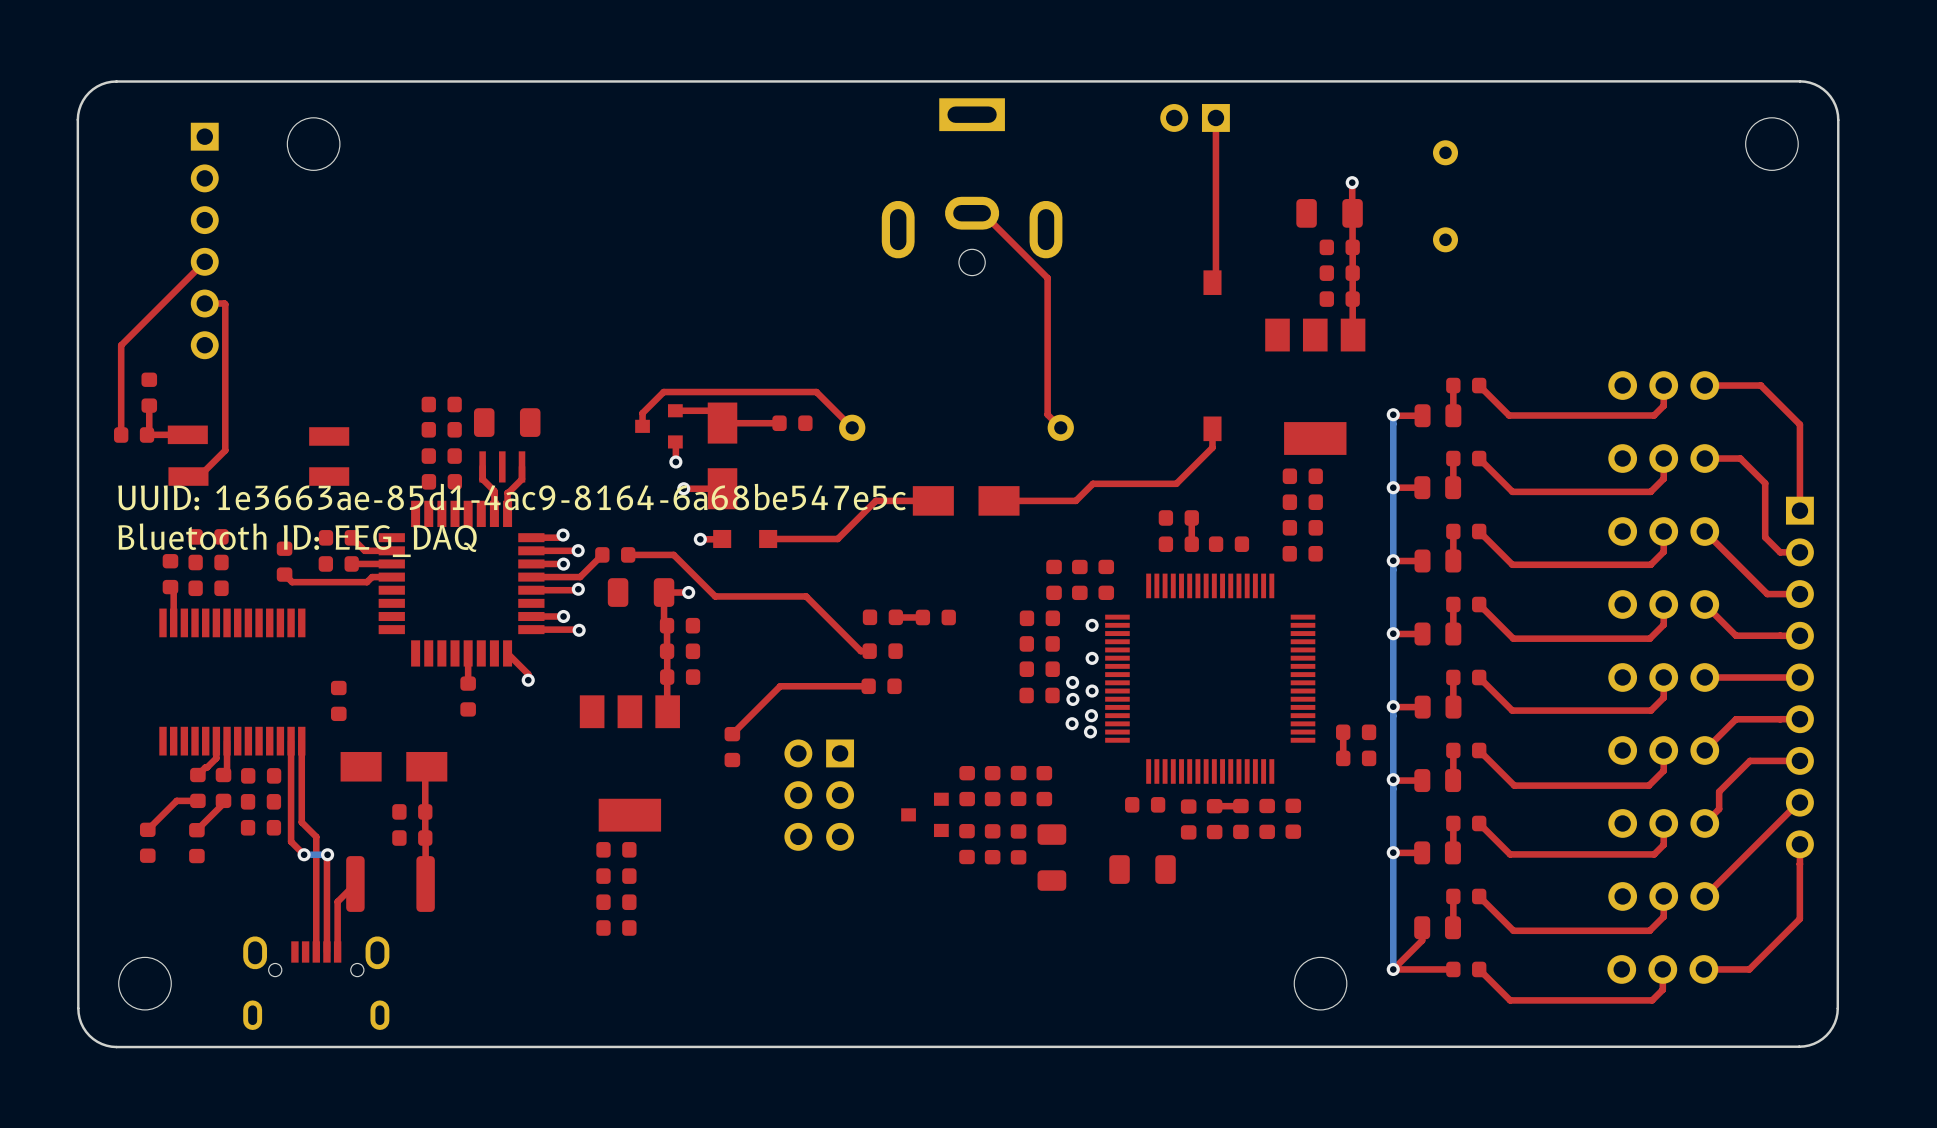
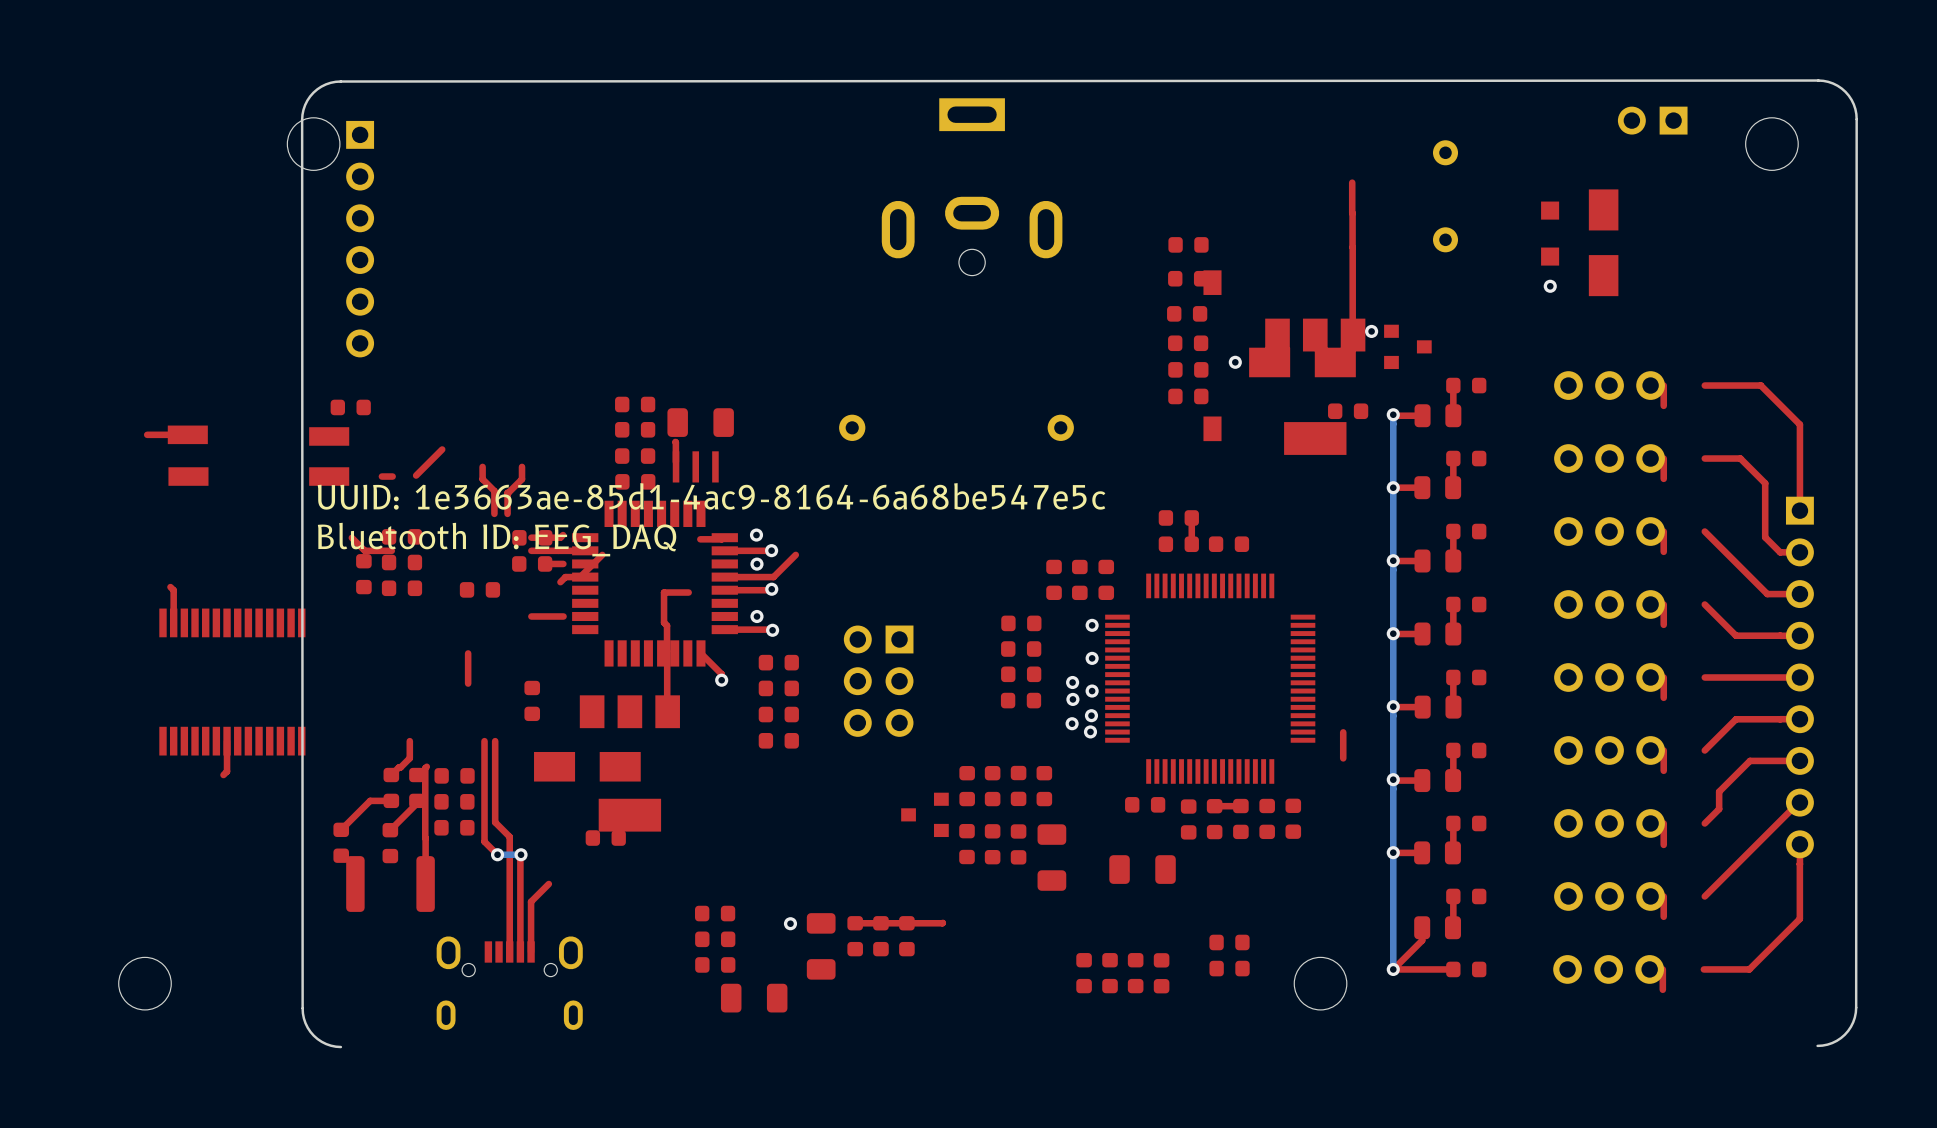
board edge: (116, 81) (101, 84) (89, 92) (80, 105) (77, 119) (78, 1008) -> none
board edge: (1799, 81) (116, 81) -> none
board edge: (1800, 81) (1814, 84) (1827, 92) (1835, 105) (1838, 119) -> none
part: (1195, 117) -> none
top track: (1215, 117) (1215, 279) (1212, 282) -> none
board edge: none -> (1856, 119) (1853, 104) (1845, 91) (1833, 83) (1818, 80) (340, 81) (321, 86) (307, 100) (302, 119) (302, 1008)
board edge: none -> (1856, 119) (1856, 1007) (1853, 1022) (1844, 1034) (1832, 1043) (1817, 1045)
part: none -> (1652, 120)
board edge: (1838, 120) (1837, 1008) (1832, 1027) (1818, 1041) (1799, 1046) (116, 1047) (101, 1044) (89, 1035) (81, 1023) (78, 1008) -> none
via: (1352, 182) -> none
top track: (972, 213) (982, 213) (1047, 278) (1047, 414) (1060, 427) -> none
part: (1329, 213) -> none
part: none -> (1550, 233)
part position: (204, 240) -> (360, 239)
part: none -> (1603, 242)
part: none -> (1188, 244)
part: (1339, 247) -> none
top track: (204, 261) (121, 345) (121, 434) -> none
part: (1339, 273) -> none
part: none -> (1188, 278)
via: none -> (1550, 286)
part: (1339, 299) -> none
top track: (204, 303) (225, 304) (225, 450) (199, 476) (188, 476) -> none
part: none -> (1187, 313)
via: none -> (1371, 331)
part: none -> (1188, 343)
part: none -> (1407, 346)
via: none -> (1235, 362)
part: none -> (1302, 362)
part: none -> (1188, 369)
top track: (1479, 385) (1509, 415) (1654, 415) (1663, 405) -> none
part: none -> (1609, 385)
part: (1663, 385) -> none
part: (149, 392) -> none
part: none -> (1188, 396)
part: (441, 404) -> none
part: none -> (635, 404)
top track: (149, 405) (149, 432) (147, 434) -> none
part: none -> (350, 407)
top track: (675, 410) (710, 410) (722, 423) (779, 423) -> none
part: none -> (1348, 411)
part: (507, 422) -> none
part: none -> (700, 422)
part: (792, 423) -> none
top track: (642, 426) (642, 413) (663, 392) (816, 392) (852, 427) -> none
part: (658, 426) -> none
top track: (1212, 428) (1212, 447) (1176, 483) (1092, 483) (1075, 500) (999, 500) -> none
part: (441, 429) -> none
part: none -> (635, 429)
part: (134, 434) -> none
top track: none -> (442, 449) (416, 475)
part: (722, 455) -> none
part: (441, 456) -> none
part: none -> (635, 456)
top track: (1479, 458) (1512, 491) (1650, 491) (1663, 478) -> none
part: none -> (1609, 458)
part: (1663, 458) -> none
via: (675, 461) -> none
part position: (502, 466) -> (695, 466)
top track: none -> (392, 476) (381, 476)
part: (1302, 476) -> none
part: (441, 481) -> none
part: none -> (635, 481)
via: (683, 488) -> none
top track: (722, 488) (683, 488) -> none
text position: UUID: 1e3663ae-85d1-4ac9-8164-6a68be547e5c (512, 497) -> UUID: 1e3663ae-85d1-4ac9-8164-6a68be547e5c (711, 496)
top track: (933, 500) (875, 500) (837, 538) (768, 538) -> none
part: (966, 500) -> none
part: (1302, 502) -> none
part: (1302, 527) -> none
top track: (1479, 531) (1512, 564) (1650, 564) (1663, 551) -> none
part: none -> (1609, 531)
part: (1663, 531) -> none
via: (563, 535) -> none
via: none -> (756, 535)
part: (208, 536) -> none
part: none -> (402, 536)
part: (338, 537) -> none
part: none -> (532, 537)
part: (745, 538) -> none
via: (700, 539) -> none
text position: Bluetooth ID: EEG_DAQ (297, 540) -> Bluetooth ID: EEG_DAQ (497, 539)
via: (578, 550) -> none
top track: none -> (771, 550) (724, 550)
via: none -> (771, 550)
part: (1302, 553) -> none
part: (615, 554) -> none
top track: (628, 554) (673, 554) (715, 596) (806, 596) (860, 651) (869, 651) -> none
top track: none -> (795, 554) (773, 577) (724, 577)
part: (284, 561) -> none
part: (208, 562) -> none
part: none -> (402, 562)
part: (338, 563) -> none
top track: (391, 563) (351, 563) -> none
part: none -> (532, 563)
via: (563, 564) -> none
via: none -> (756, 564)
part: (170, 574) -> none
top track: (284, 574) (292, 582) (367, 582) (372, 577) (391, 577) -> none
part: none -> (363, 574)
top track: (565, 577) (531, 577) -> (565, 577) (560, 582)
part position: (461, 583) -> (655, 583)
part: (208, 588) -> none
part: none -> (402, 588)
part: none -> (479, 589)
top track: (578, 589) (531, 590) -> (771, 589) (724, 590)
via: (578, 589) -> none
via: none -> (771, 589)
part: (641, 592) -> none
via: (688, 592) -> none
top track: (1479, 604) (1513, 638) (1649, 638) (1663, 624) -> none
part: none -> (1609, 604)
part: (1663, 604) -> none
via: (563, 616) -> none
via: none -> (756, 616)
part: (882, 617) -> none
top track: (922, 617) (896, 617) -> none
part: (935, 617) -> none
part: (1039, 618) -> none
part: none -> (1021, 623)
part: (679, 625) -> none
top track: (531, 629) (579, 630) -> (724, 629) (772, 630)
via: (579, 630) -> none
via: none -> (772, 630)
part: (1039, 643) -> none
part: none -> (1021, 649)
part: (680, 651) -> none
part: (882, 651) -> none
top track: (507, 653) (528, 674) (528, 680) -> (700, 653) (721, 674) (721, 680)
part: none -> (778, 662)
part: (1039, 669) -> none
part: none -> (1021, 674)
part: (680, 677) -> none
top track: (1479, 677) (1512, 710) (1650, 710) (1663, 697) -> none
part: none -> (1609, 677)
part: (1663, 677) -> none
part footprint: [861, 678, 902, 695] -> [843, 625, 914, 737]
via: (528, 680) -> none
via: none -> (721, 680)
top track: (868, 686) (780, 686) (732, 734) -> none
part: none -> (778, 688)
part: (1039, 695) -> none
part: (468, 696) -> none
part: (338, 700) -> none
part: none -> (532, 700)
part: none -> (1021, 700)
part: none -> (778, 714)
part: (1356, 732) -> none
part: none -> (778, 740)
top track: (216, 741) (216, 758) (197, 775) -> (409, 741) (409, 758) (391, 775)
top track: (291, 741) (291, 841) (304, 854) -> (484, 741) (484, 841) (497, 854)
top track: (301, 741) (301, 822) (316, 836) (316, 951) -> (495, 741) (495, 822) (509, 836) (509, 951)
part: (732, 747) -> none
top track: (1479, 750) (1514, 785) (1648, 785) (1663, 770) -> none
part: none -> (1609, 750)
part: (1663, 750) -> none
part: (1356, 758) -> none
part: (393, 766) -> none
part: none -> (587, 766)
part: (261, 775) -> none
part: none -> (454, 775)
part: (197, 787) -> none
part: (223, 787) -> none
part: none -> (391, 787)
part: none -> (416, 787)
part: (819, 795) -> none
top track: (197, 800) (176, 800) (147, 829) -> (391, 800) (370, 800) (341, 829)
top track: (223, 800) (223, 803) (196, 830) -> (416, 800) (416, 803) (390, 830)
part: (260, 801) -> none
part: none -> (454, 801)
part: (412, 811) -> none
top track: (1479, 823) (1510, 854) (1654, 854) (1663, 844) -> none
part: none -> (1609, 823)
part: (1663, 823) -> none
part: (260, 827) -> none
part: none -> (454, 827)
part: (412, 838) -> none
part: (147, 842) -> none
part: none -> (341, 842)
part: (196, 843) -> none
part: none -> (390, 843)
part position: (616, 849) -> (605, 838)
via: (304, 854) -> none
top track: (327, 854) (326, 951) -> (521, 854) (520, 951)
bottom track: (327, 854) (304, 854) -> (521, 854) (497, 854)
via: (327, 854) -> none
via: none -> (497, 854)
via: none -> (521, 854)
part: (616, 876) -> none
top track: (355, 884) (337, 901) (337, 951) -> (548, 884) (531, 901) (531, 951)
top track: (1479, 896) (1513, 930) (1649, 930) (1663, 916) -> none
part: none -> (1609, 896)
part: (1663, 896) -> none
part: (616, 902) -> none
part: none -> (715, 913)
top track: none -> (942, 922) (855, 923)
via: none -> (790, 923)
part: (616, 927) -> none
part: none -> (855, 936)
part: none -> (880, 936)
part: none -> (906, 936)
part: none -> (715, 939)
part: none -> (1229, 942)
part: none -> (821, 946)
part: none -> (715, 964)
part: none -> (1229, 968)
top track: (1479, 969) (1510, 1000) (1652, 1000) (1662, 989) -> none
part: none -> (1608, 969)
part: (1662, 969) -> none
part: none -> (1084, 973)
part: none -> (1110, 973)
part: none -> (1135, 973)
part: none -> (1161, 973)
part position: (316, 983) -> (509, 983)
part: none -> (754, 998)
board edge: none -> (302, 1008) (305, 1023) (313, 1035) (326, 1044) (340, 1047)

